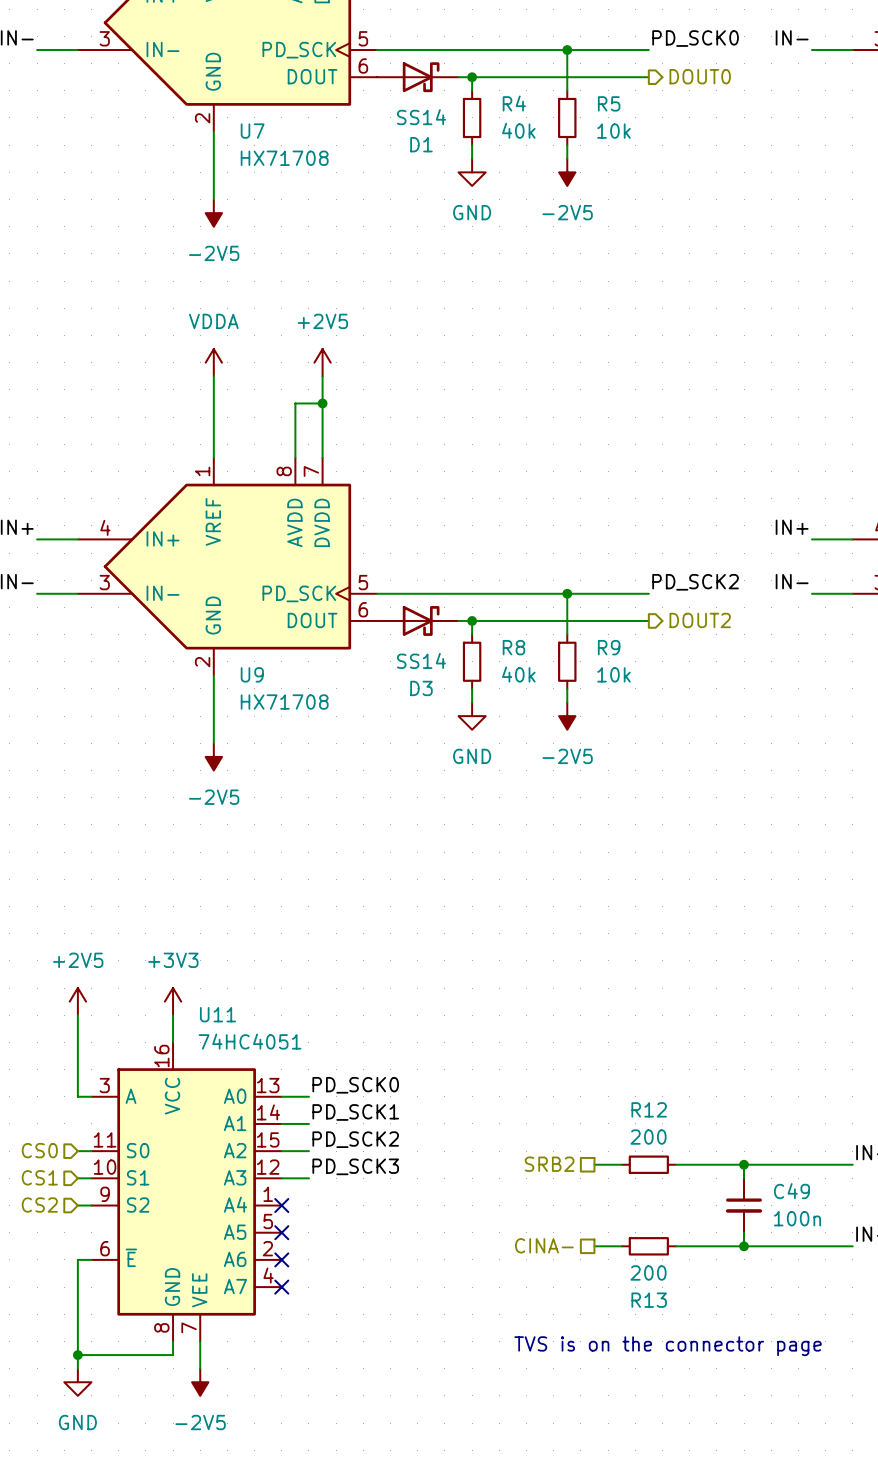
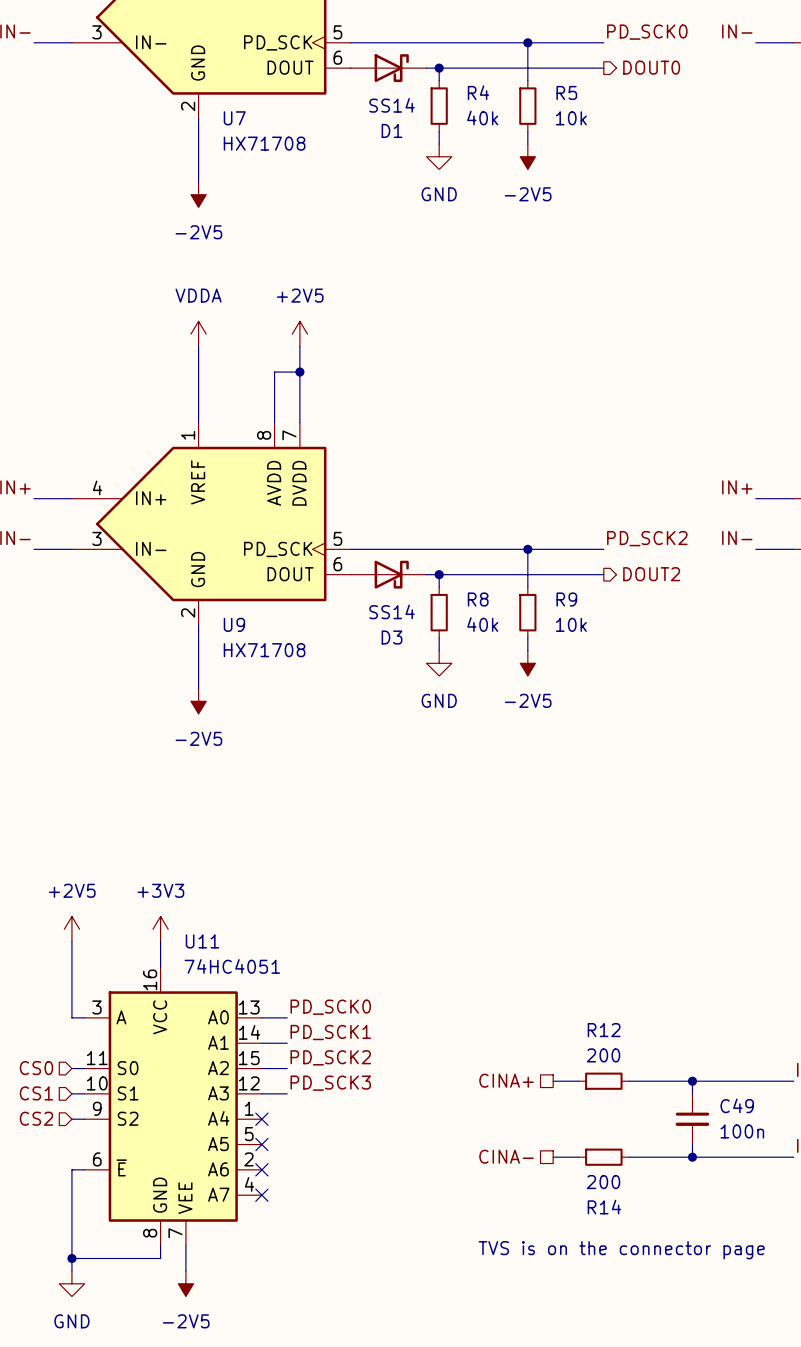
hierarchical label: SRB2 (549, 1164) -> CINA+ (506, 1080)
R13 name: R13 (649, 1300) -> R14 (604, 1207)

